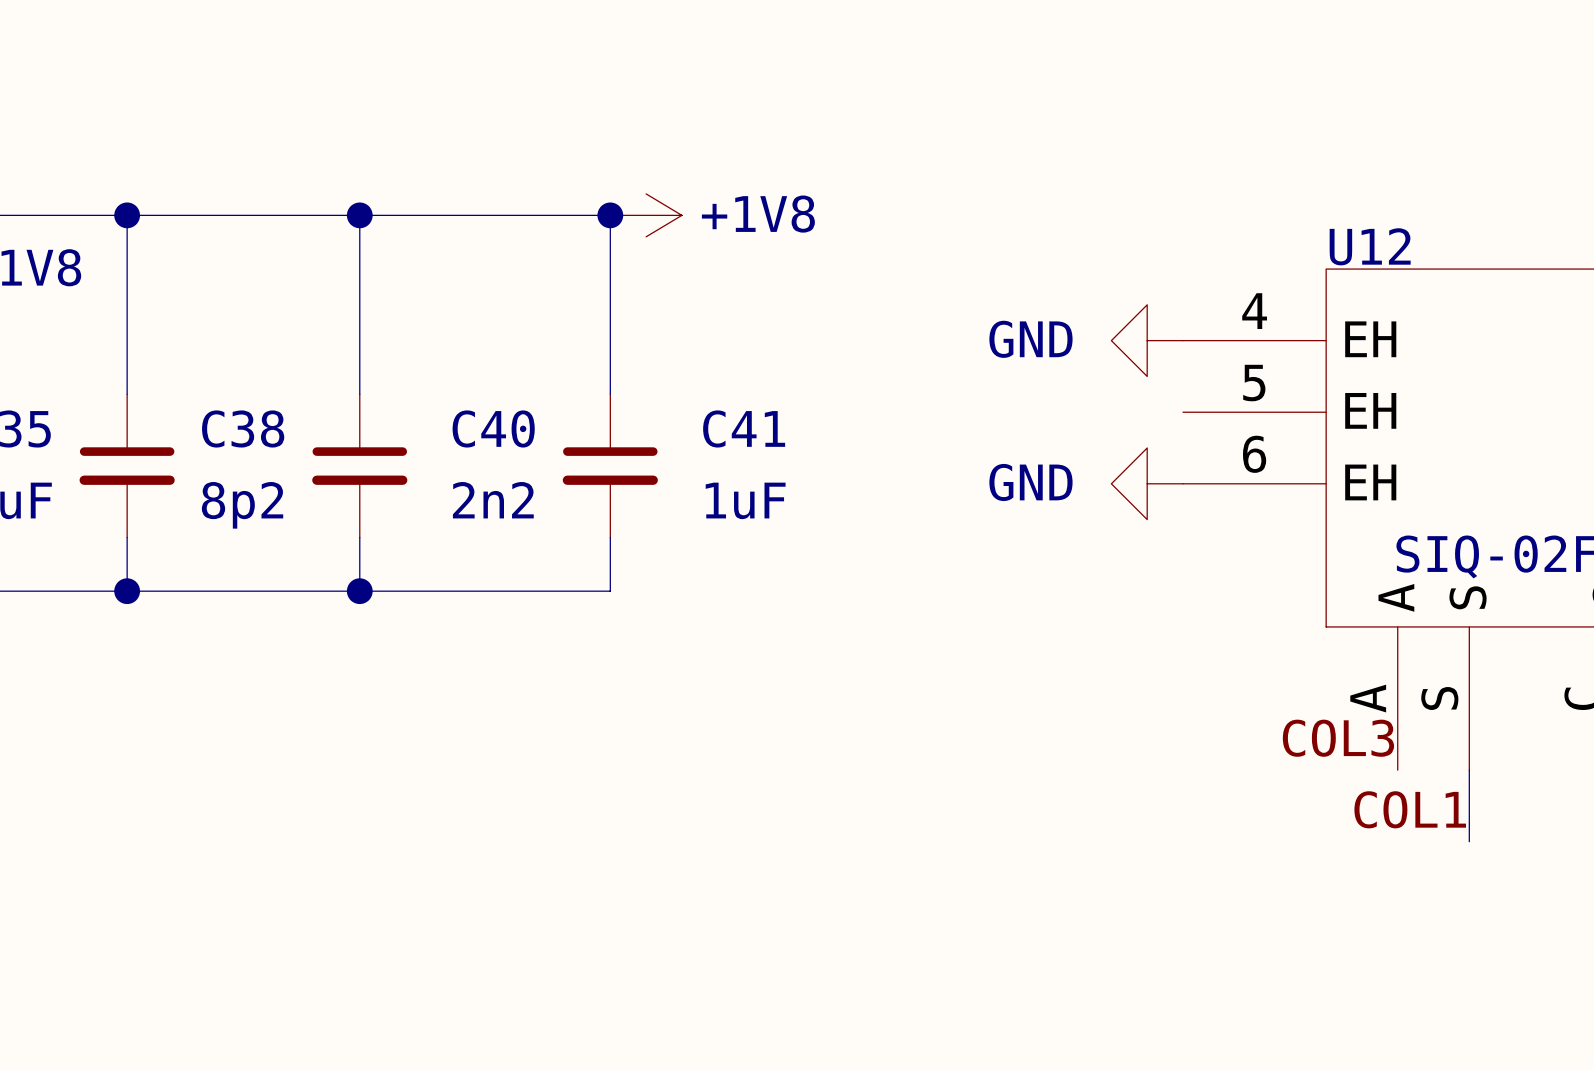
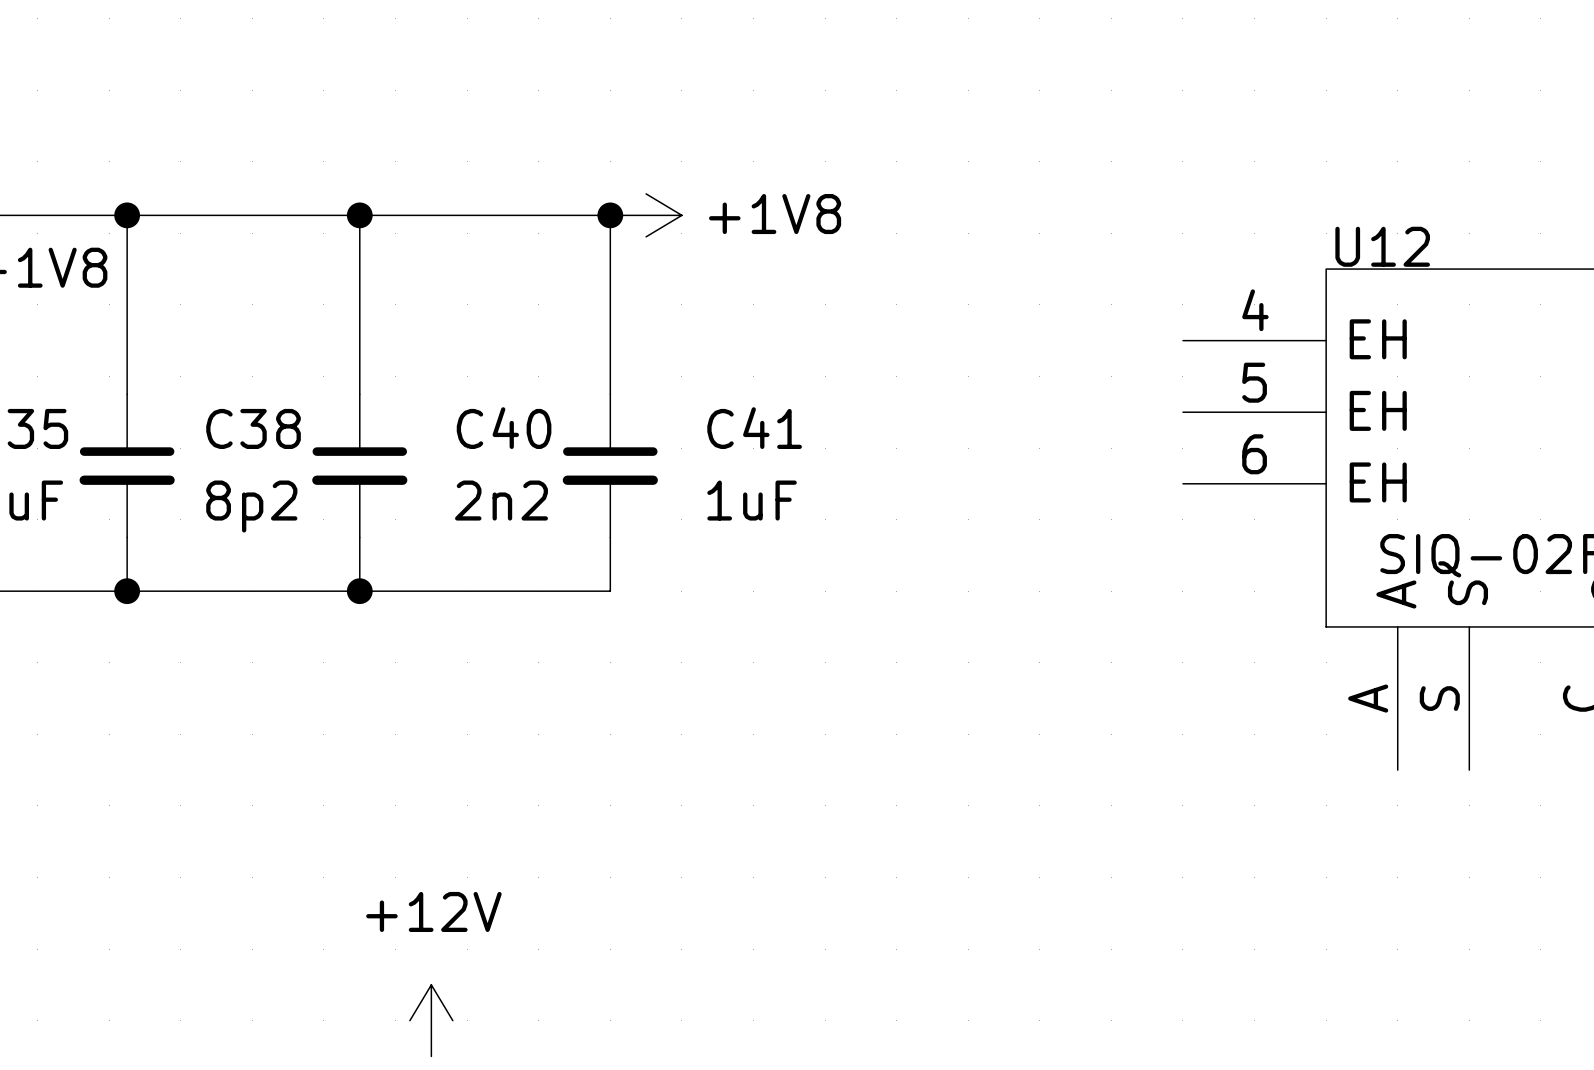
power symbol: GND (1147, 340) -> none
power symbol: GND (1147, 483) -> none
label: COL3 (1338, 738) -> none
wire: (1469, 770) (1469, 841) -> none
label: COL1 (1410, 809) -> none
power symbol: none -> +12V (431, 1020)

